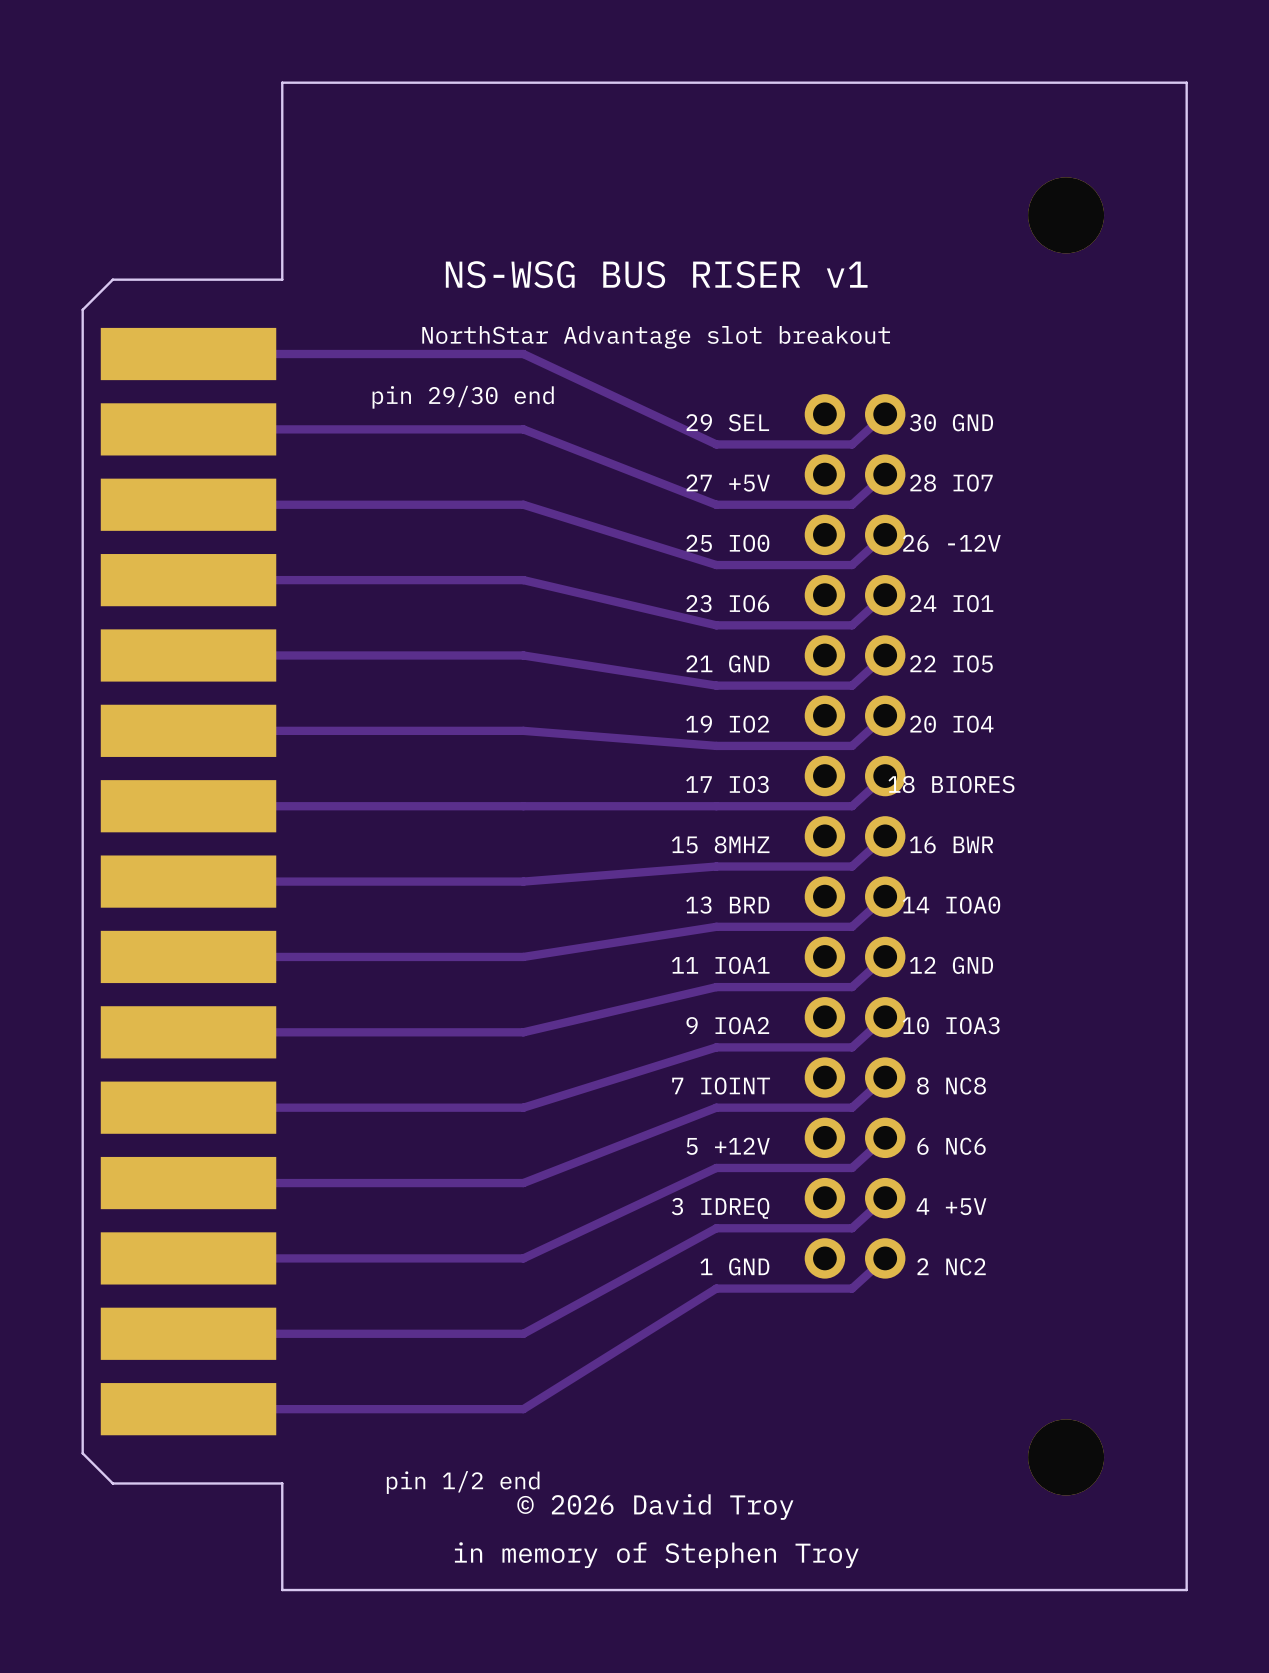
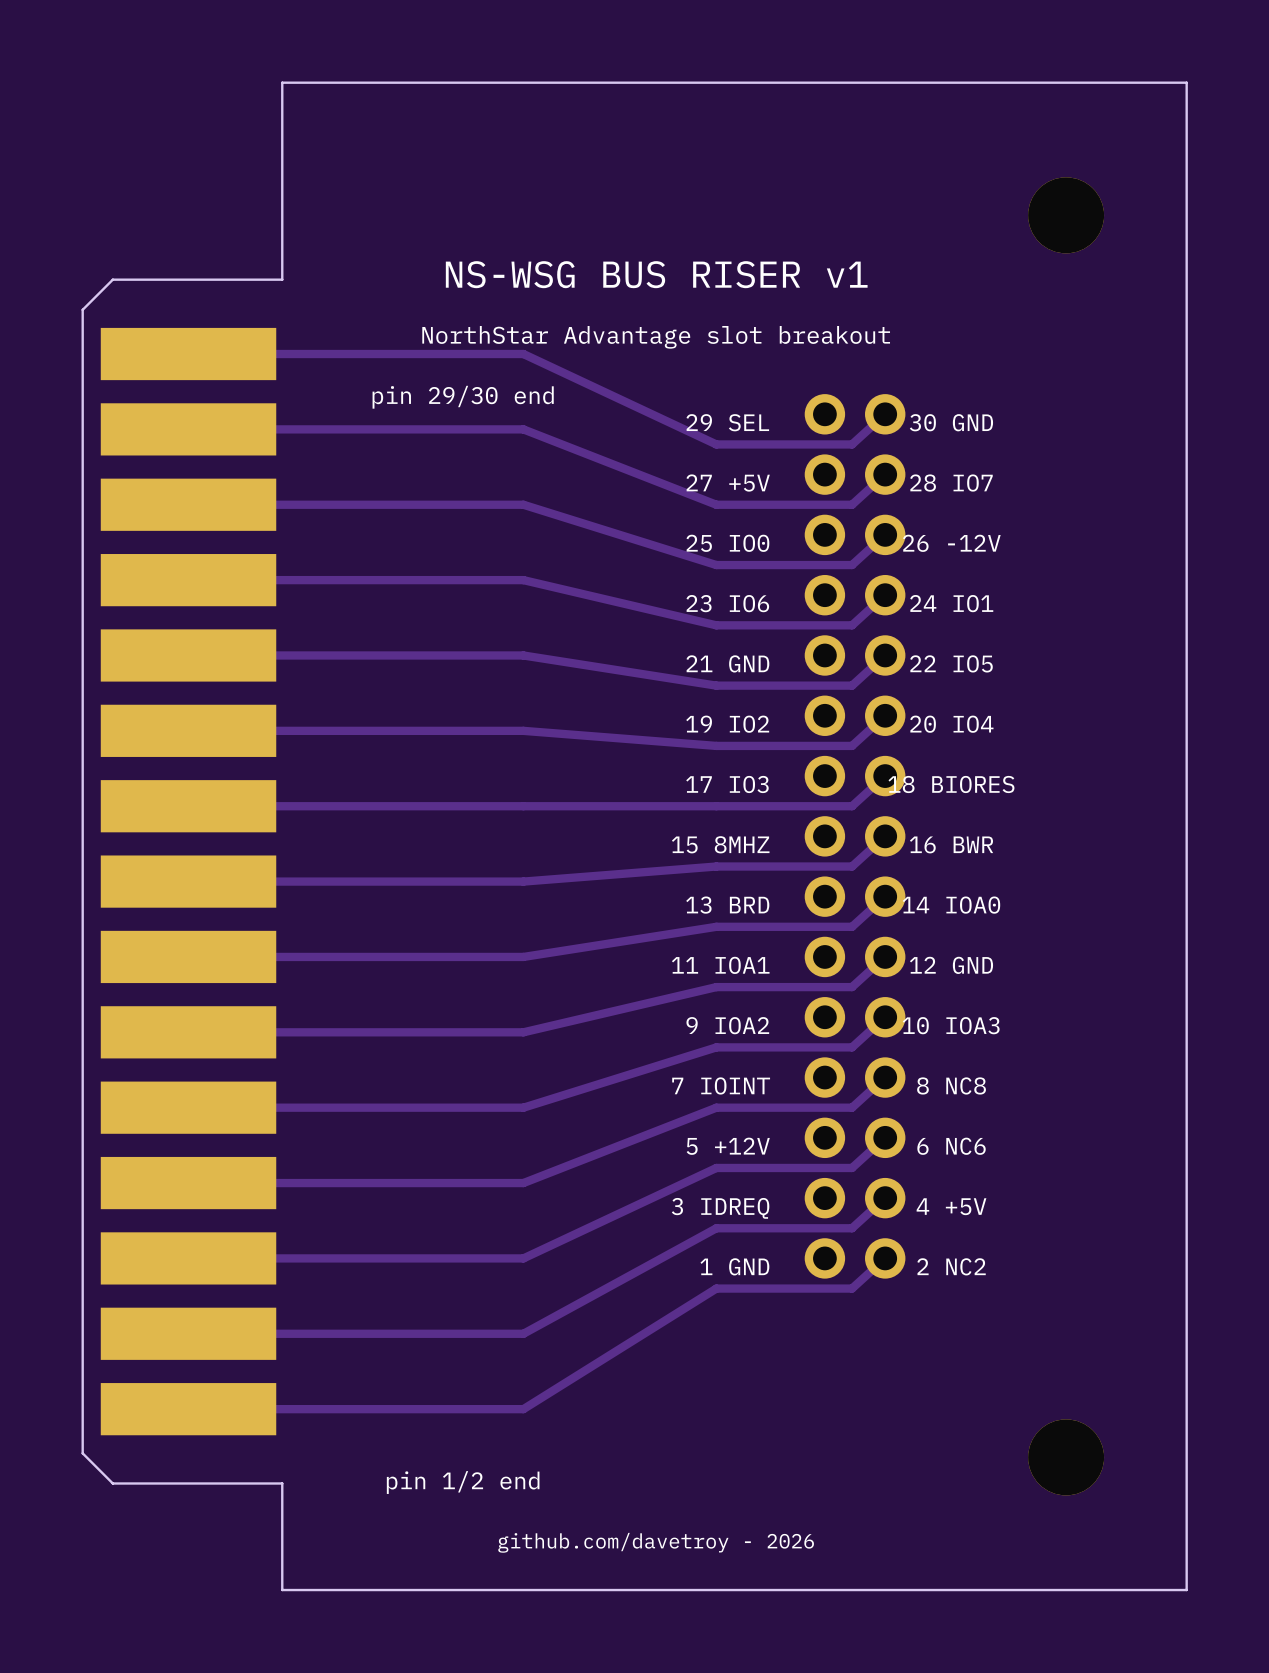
text: © 2026 David Troy (655, 1506) -> none
text: in memory of Stephen Troy (656, 1555) -> github.com/davetroy - 2026 (656, 1542)

